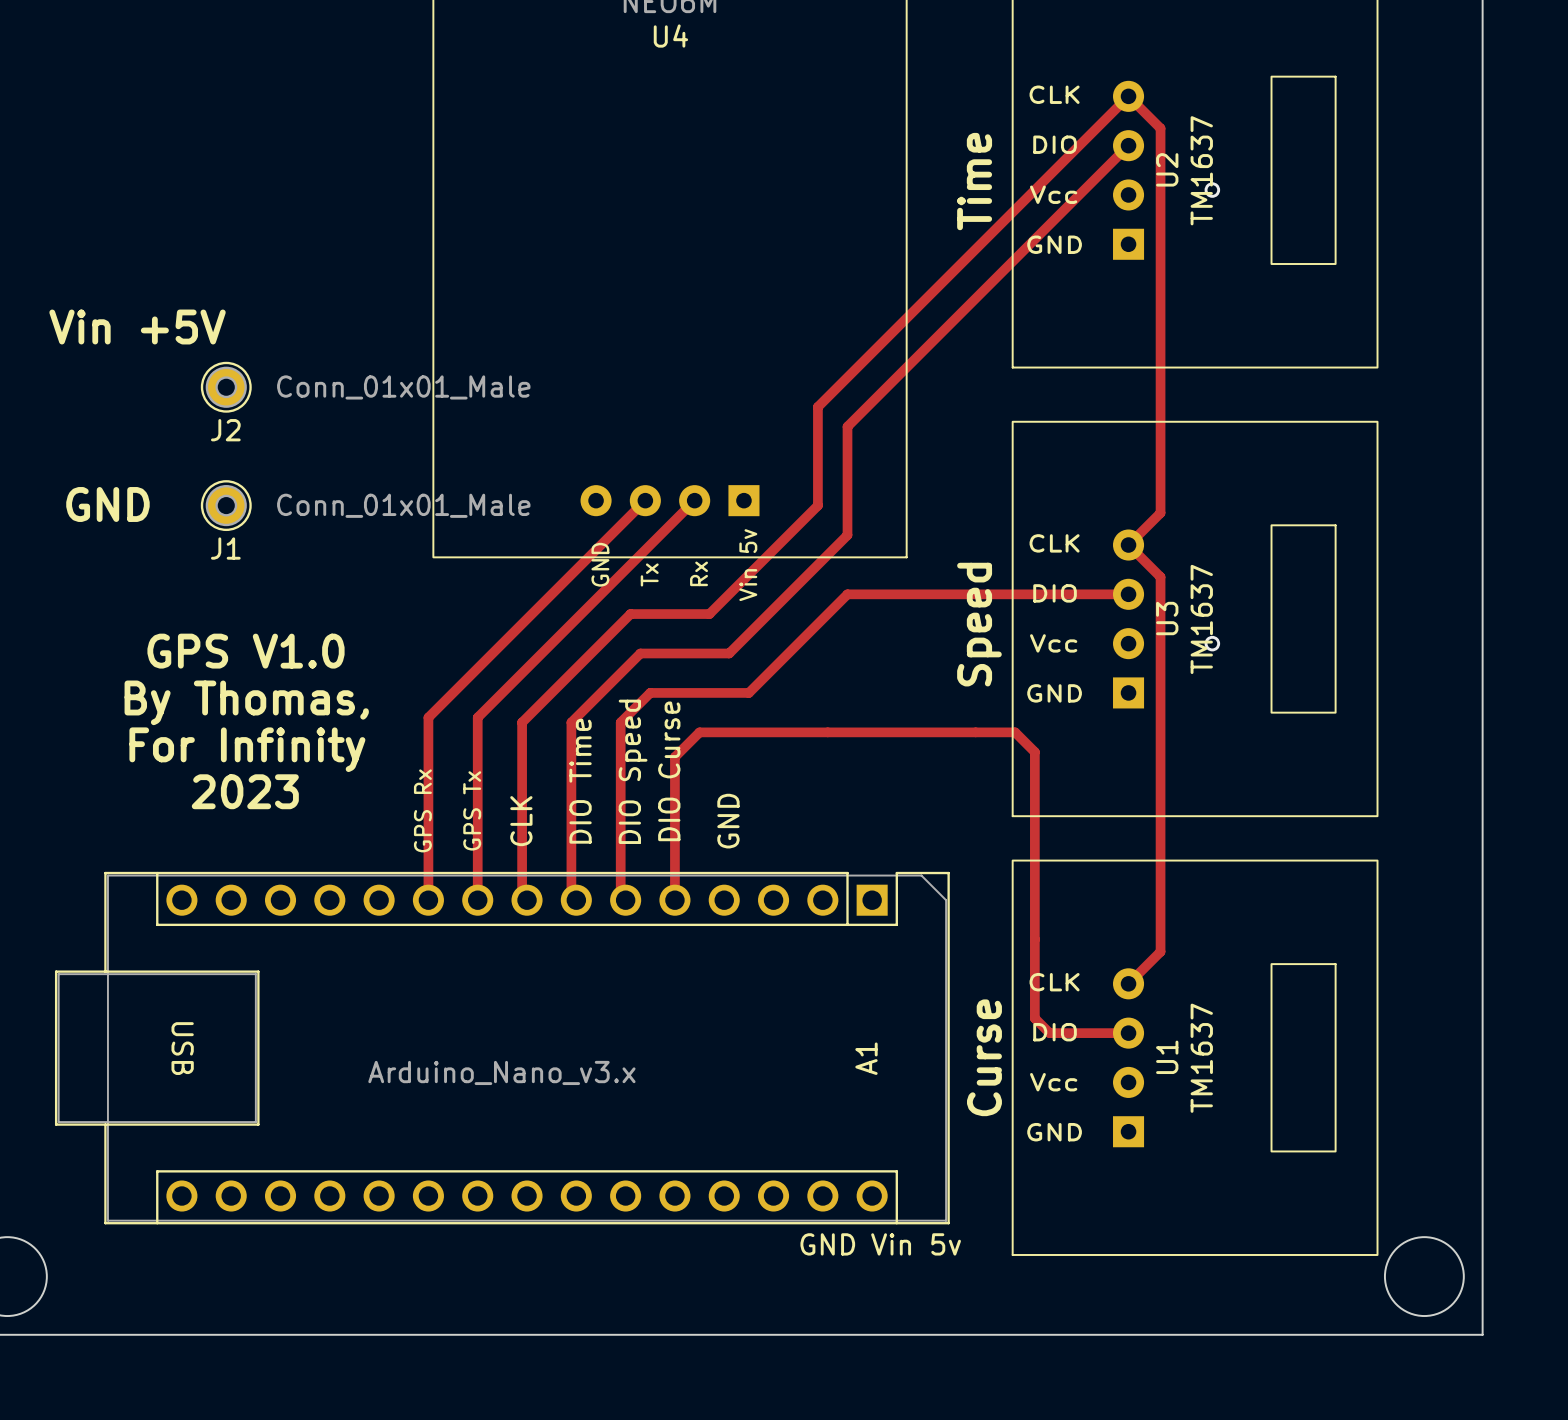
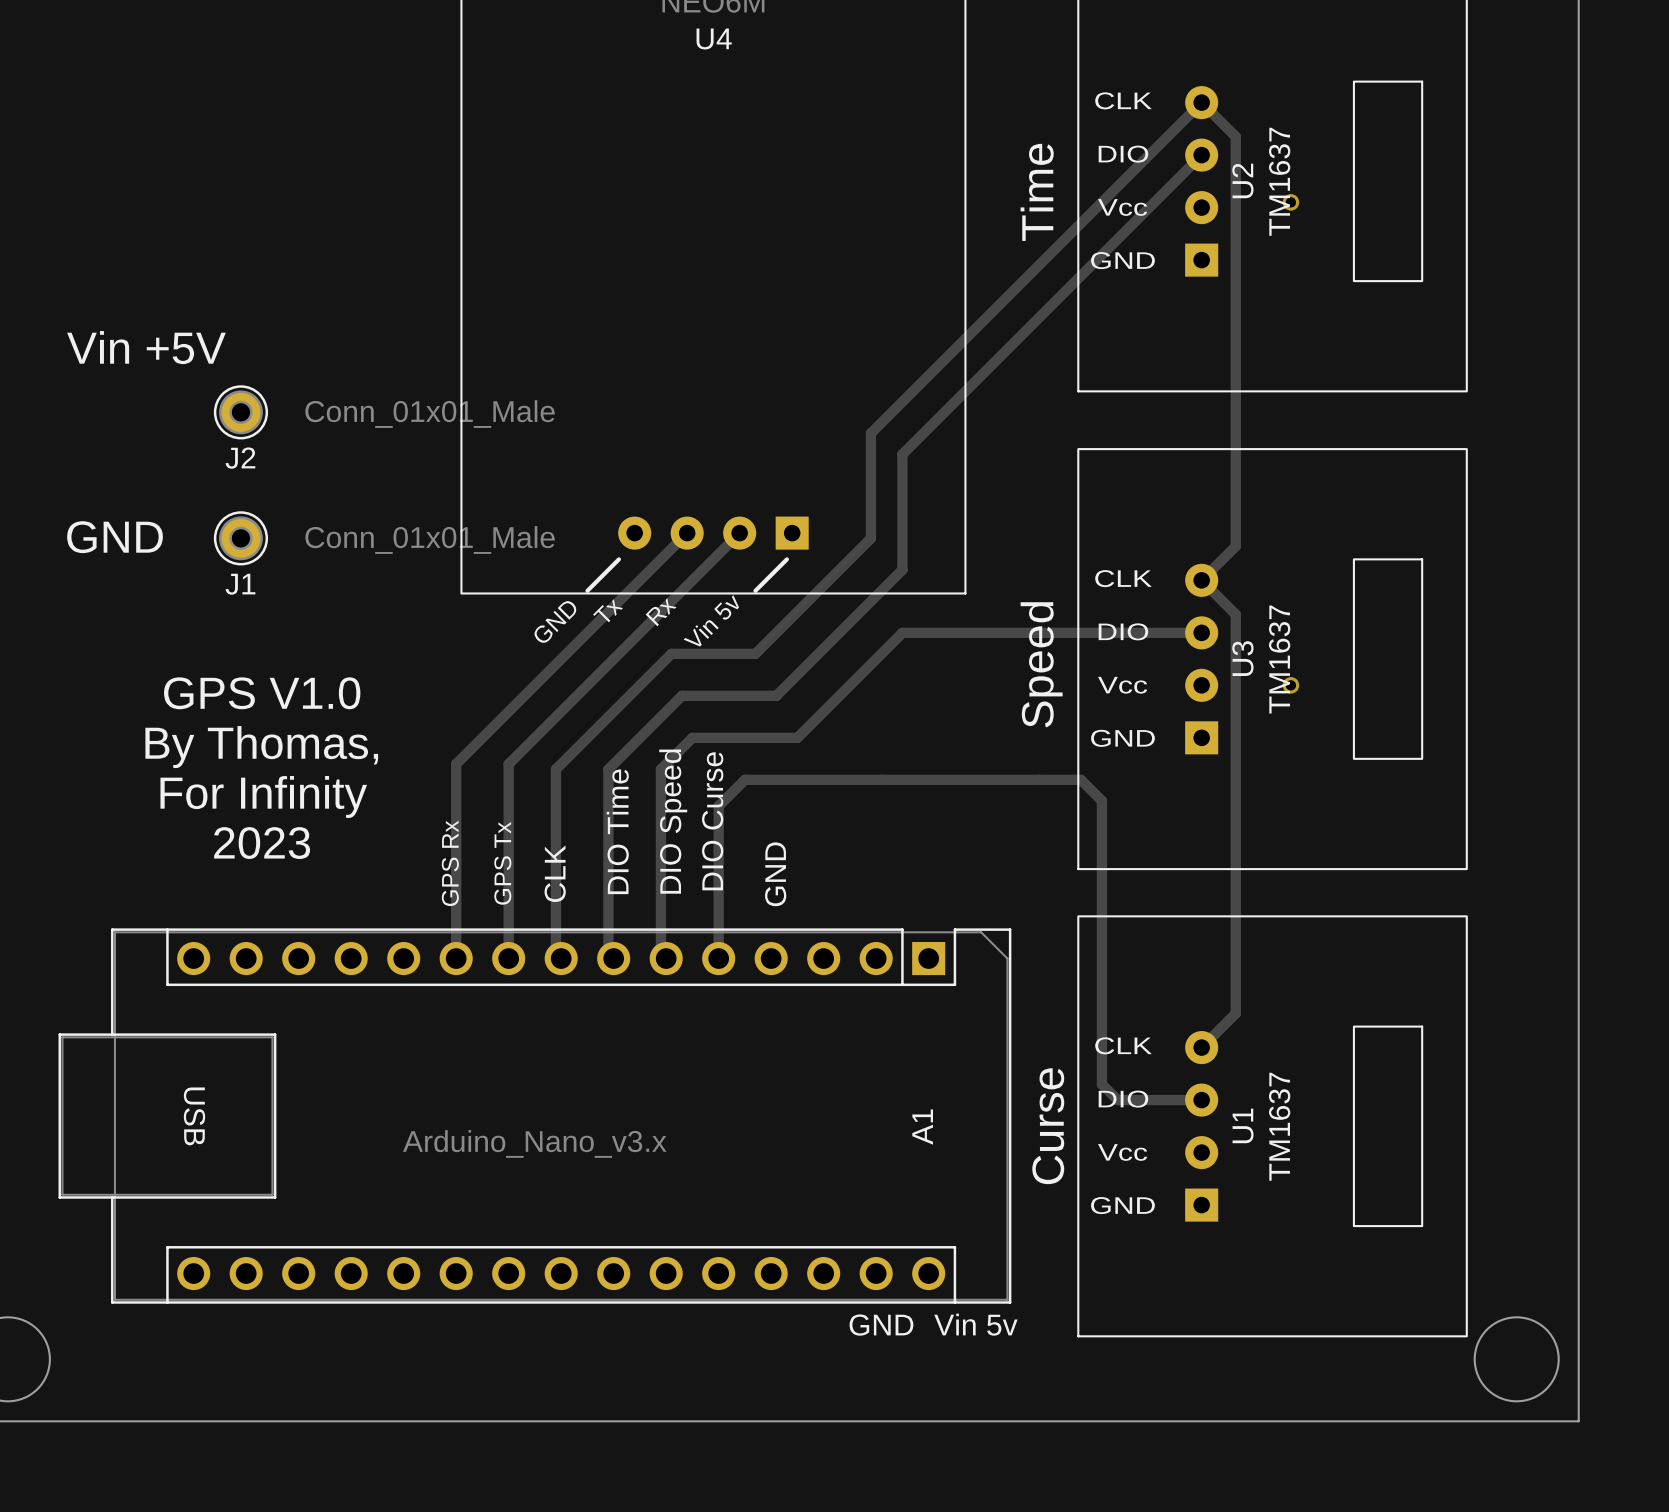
line: none -> (618, 559) (587, 590)
line: none -> (786, 559) (755, 590)
text rotation: 0° (600, 564) -> 45° clockwise (555, 622)
text position: GND (600, 564) -> GND (555, 622)
text rotation: 0° (748, 565) -> 45° clockwise (711, 620)
text rotation: 0° (699, 573) -> 45° clockwise (661, 612)
text position: Rx (699, 573) -> Rx (661, 612)
text rotation: 0° (649, 574) -> 45° clockwise (608, 610)
text position: Tx (649, 574) -> Tx (608, 610)

